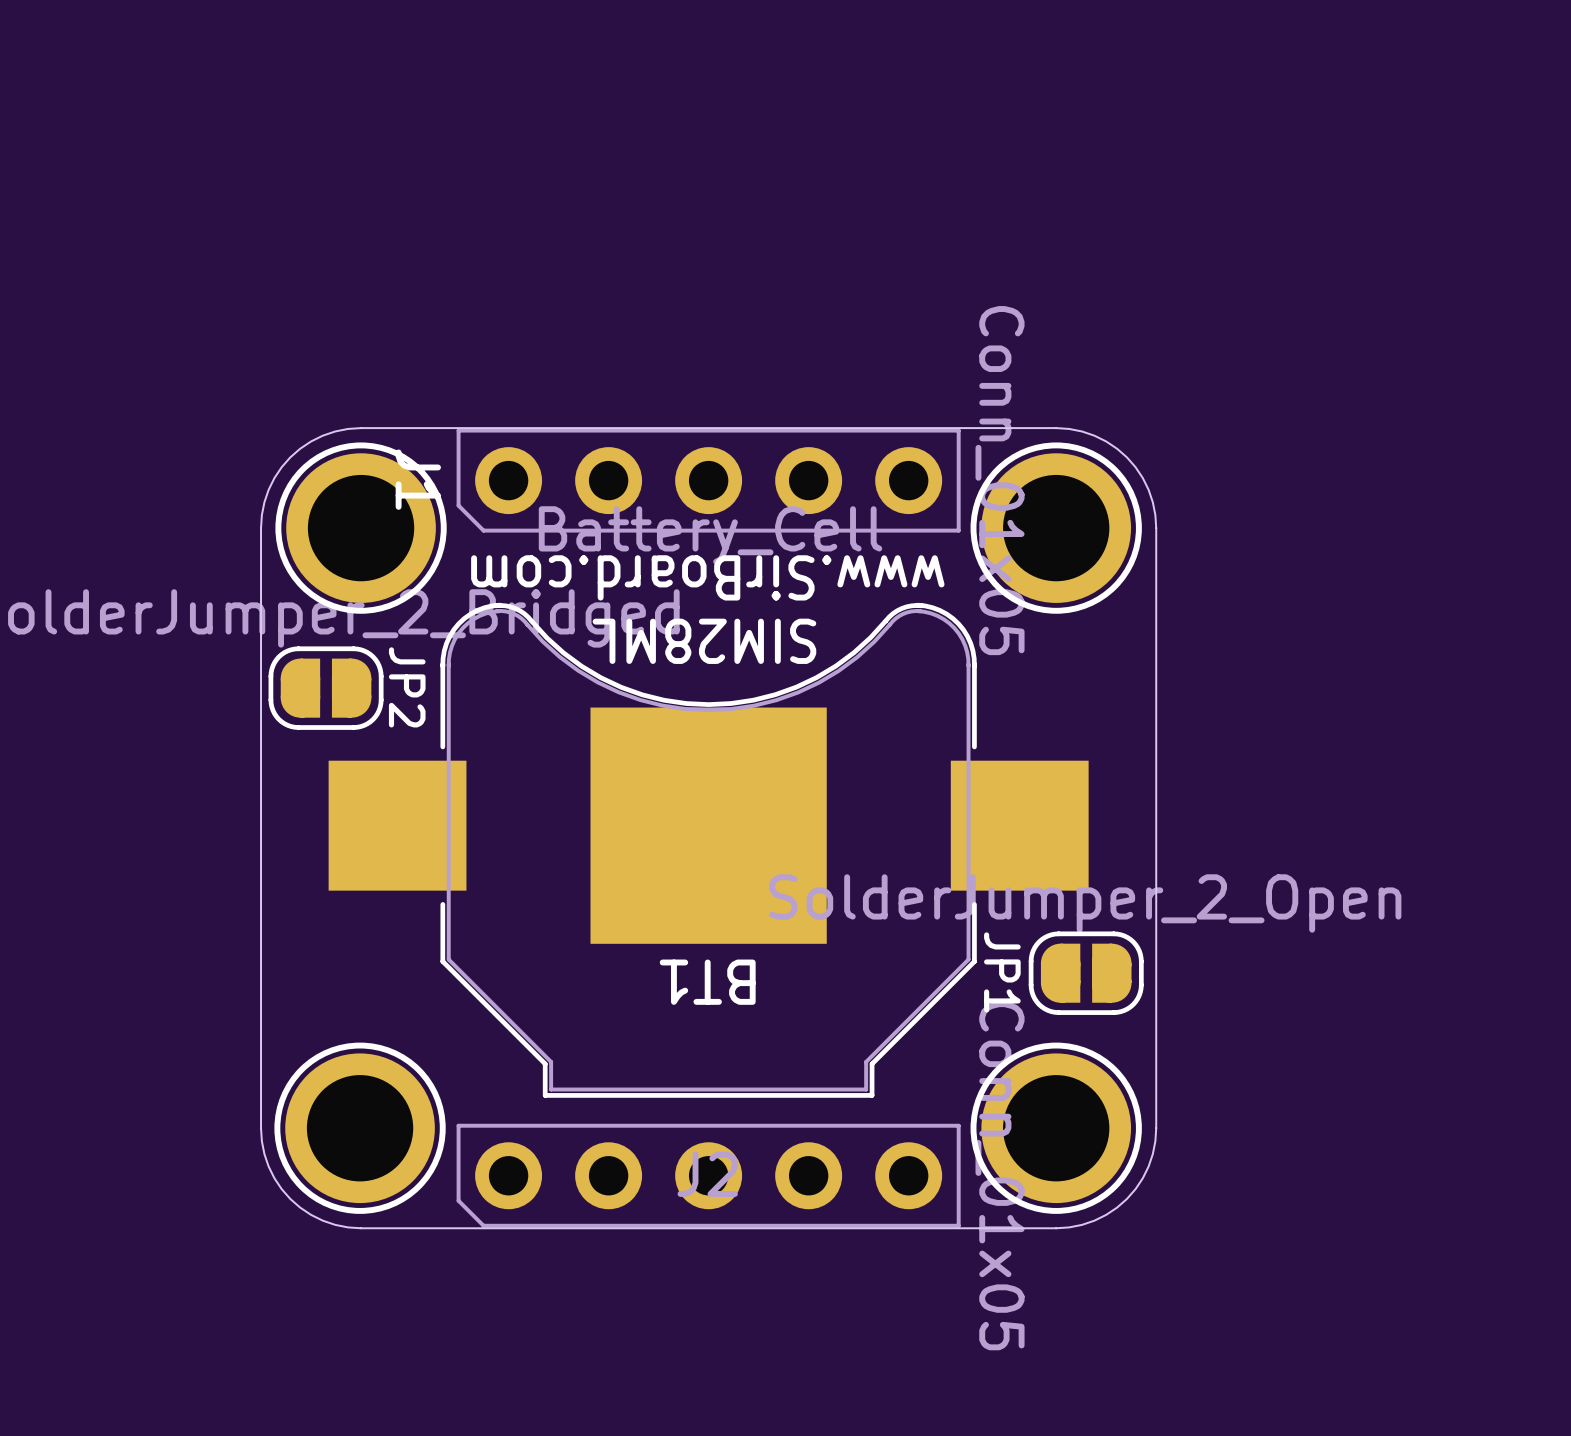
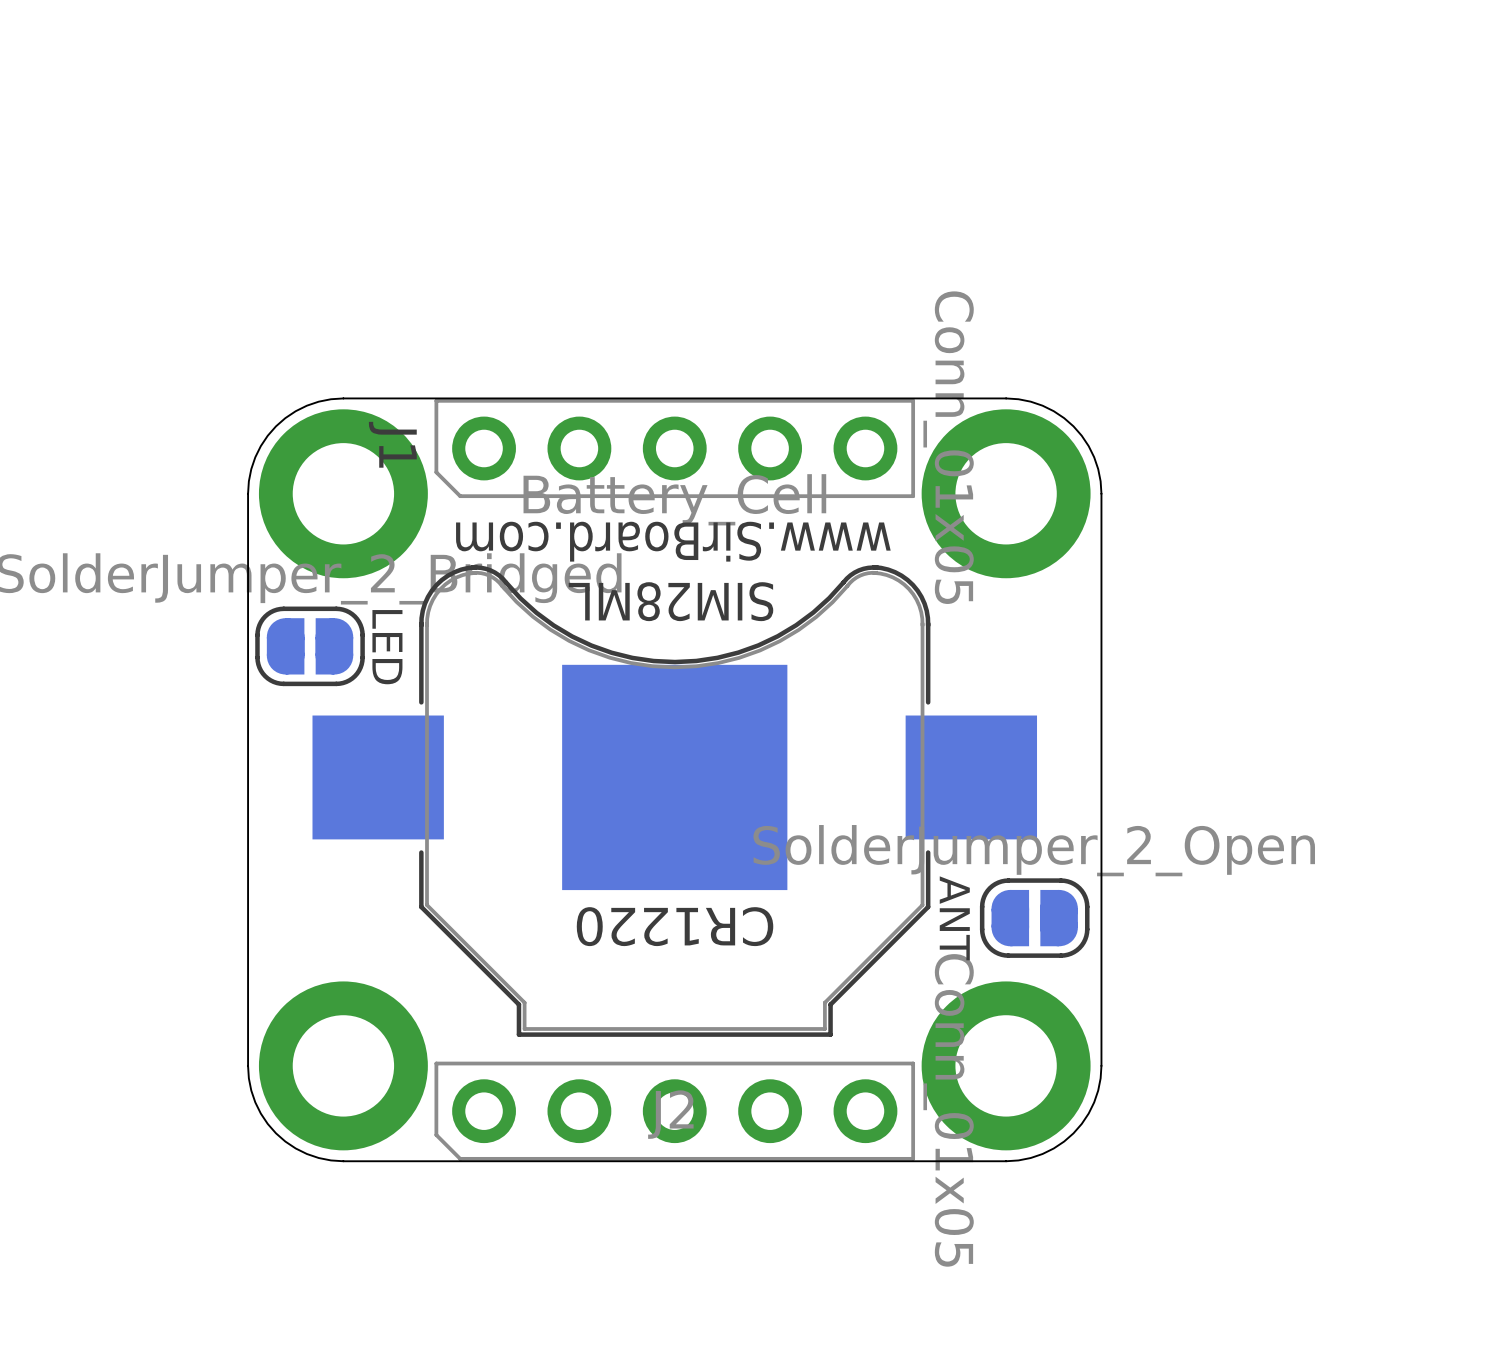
part footprint: [275, 442, 447, 614] -> [258, 409, 428, 579]
part footprint: [970, 442, 1142, 614] -> [921, 409, 1091, 579]
JP2 name: JP2 (407, 687) -> LED (387, 647)
JP1 name: JP1 (1002, 972) -> ANT (954, 918)
BT1 name: BT1 (707, 982) -> CR1220 (675, 926)
part footprint: [274, 1042, 446, 1214] -> [258, 981, 428, 1151]
part footprint: [970, 1042, 1142, 1214] -> [921, 981, 1091, 1151]

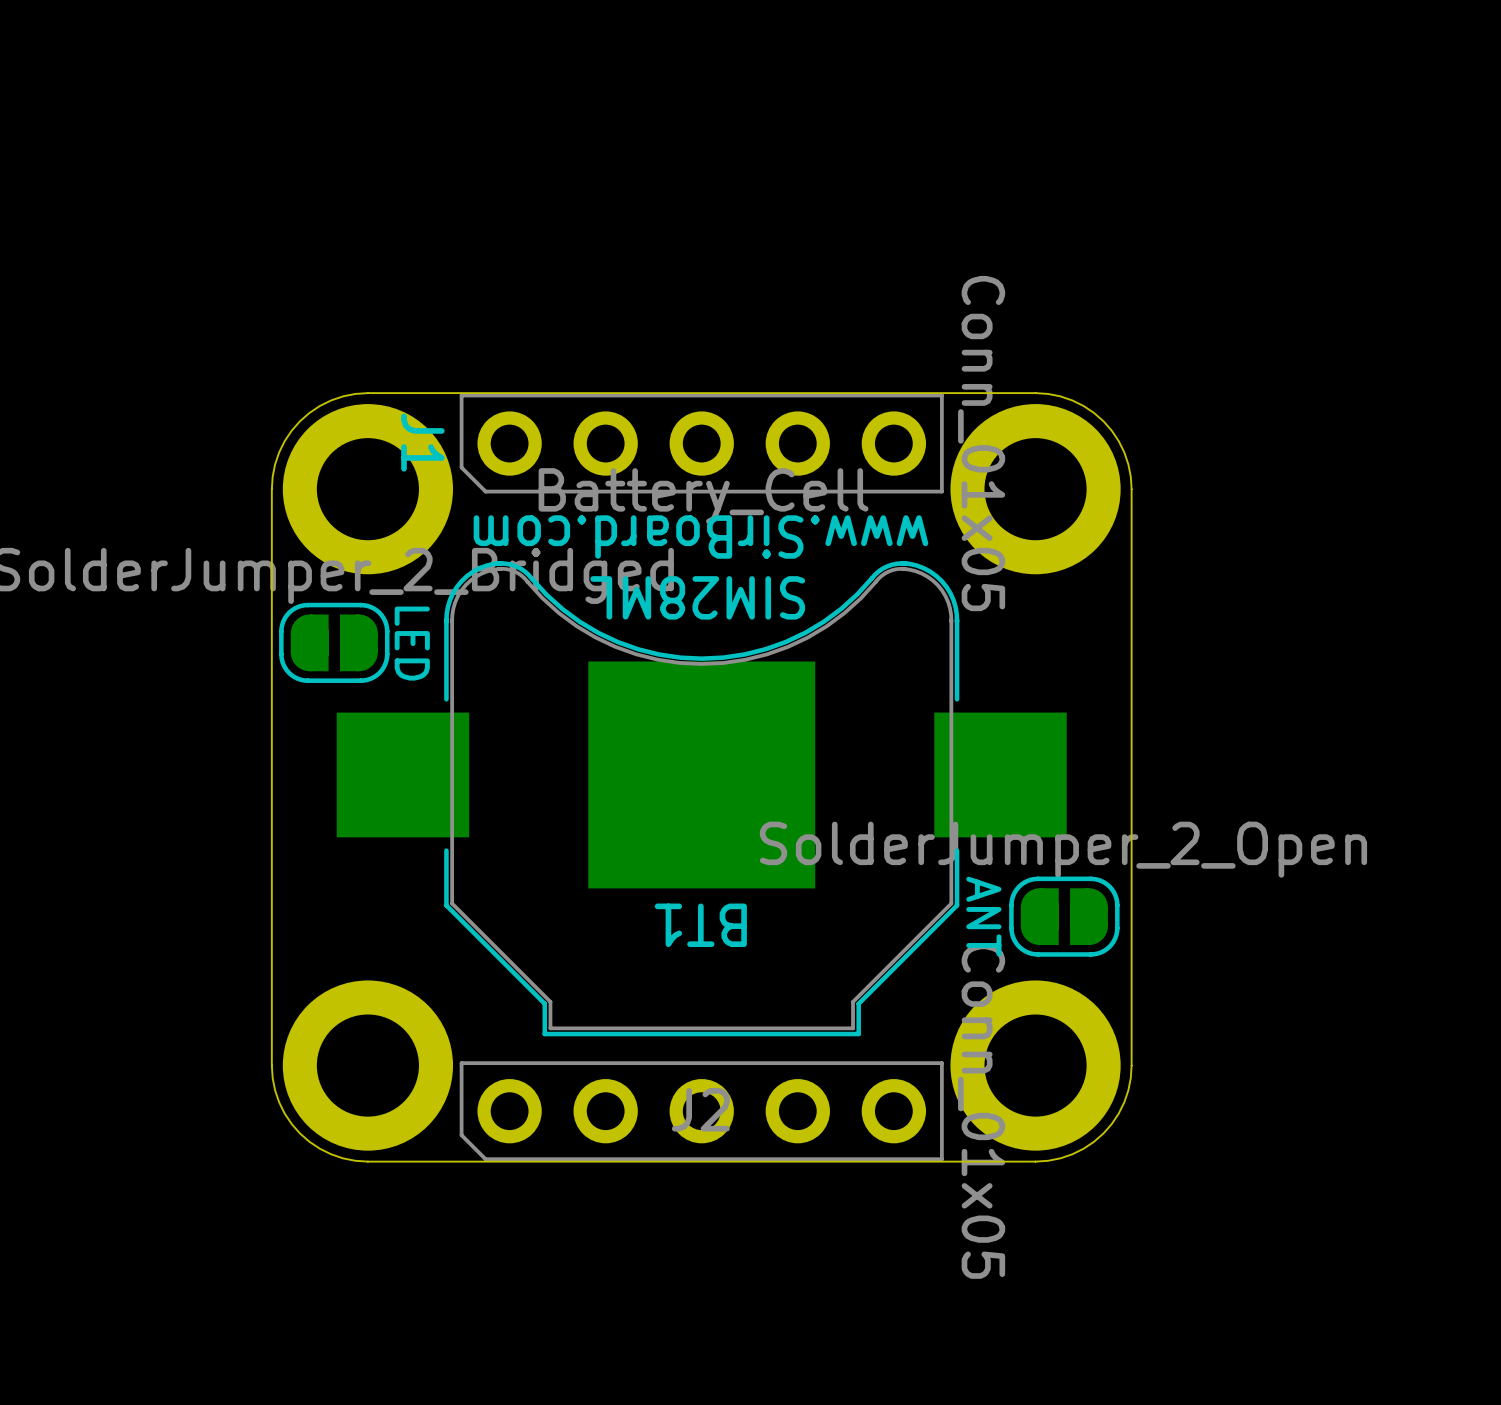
CR1220 name: CR1220 (675, 926) -> BT1 (700, 925)

